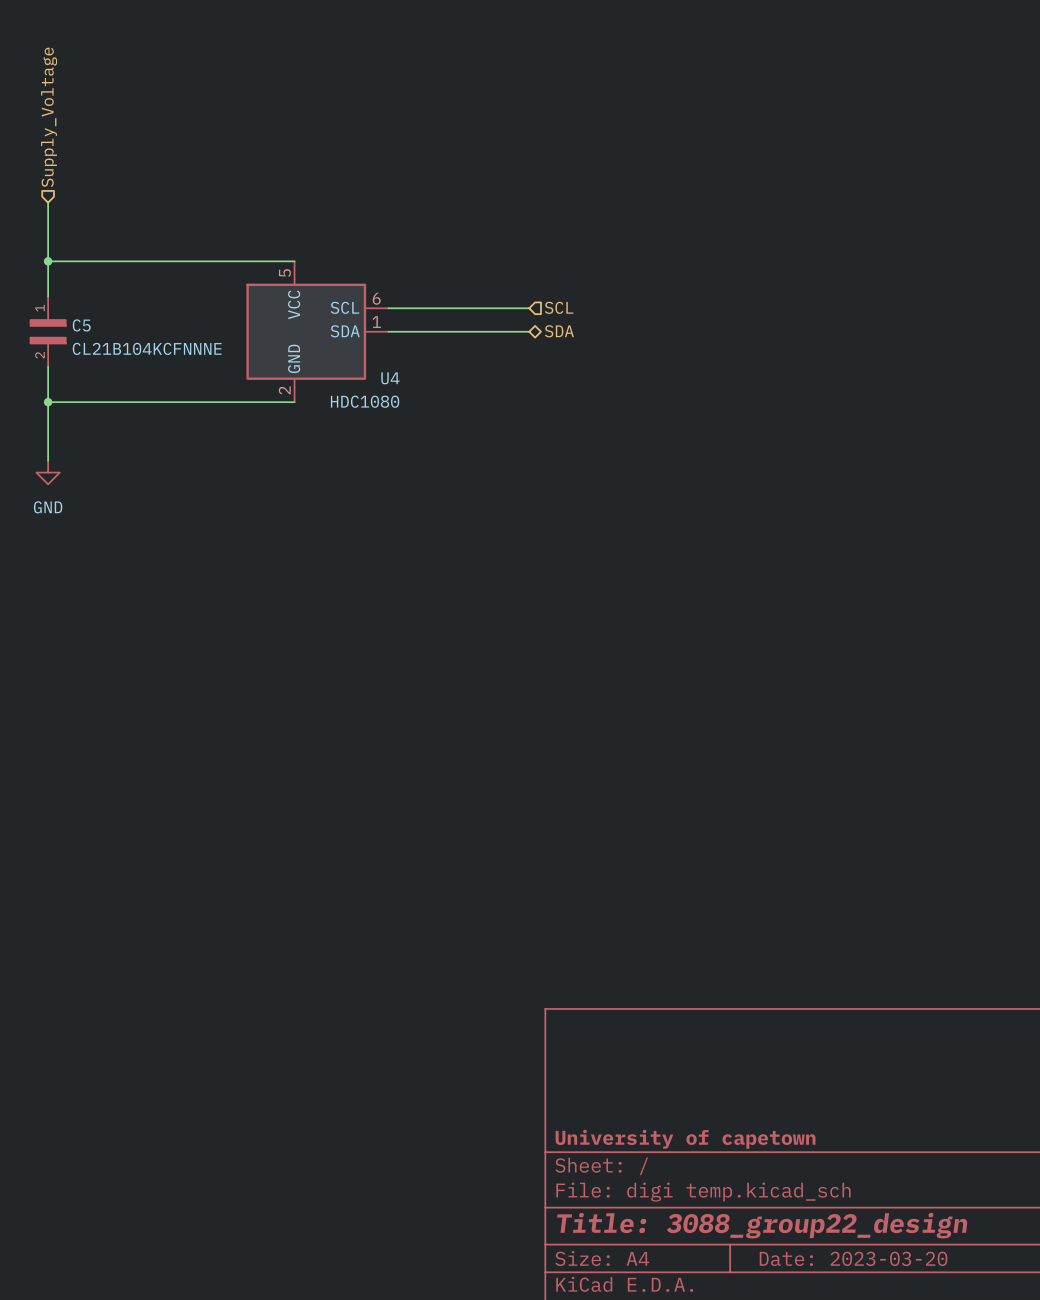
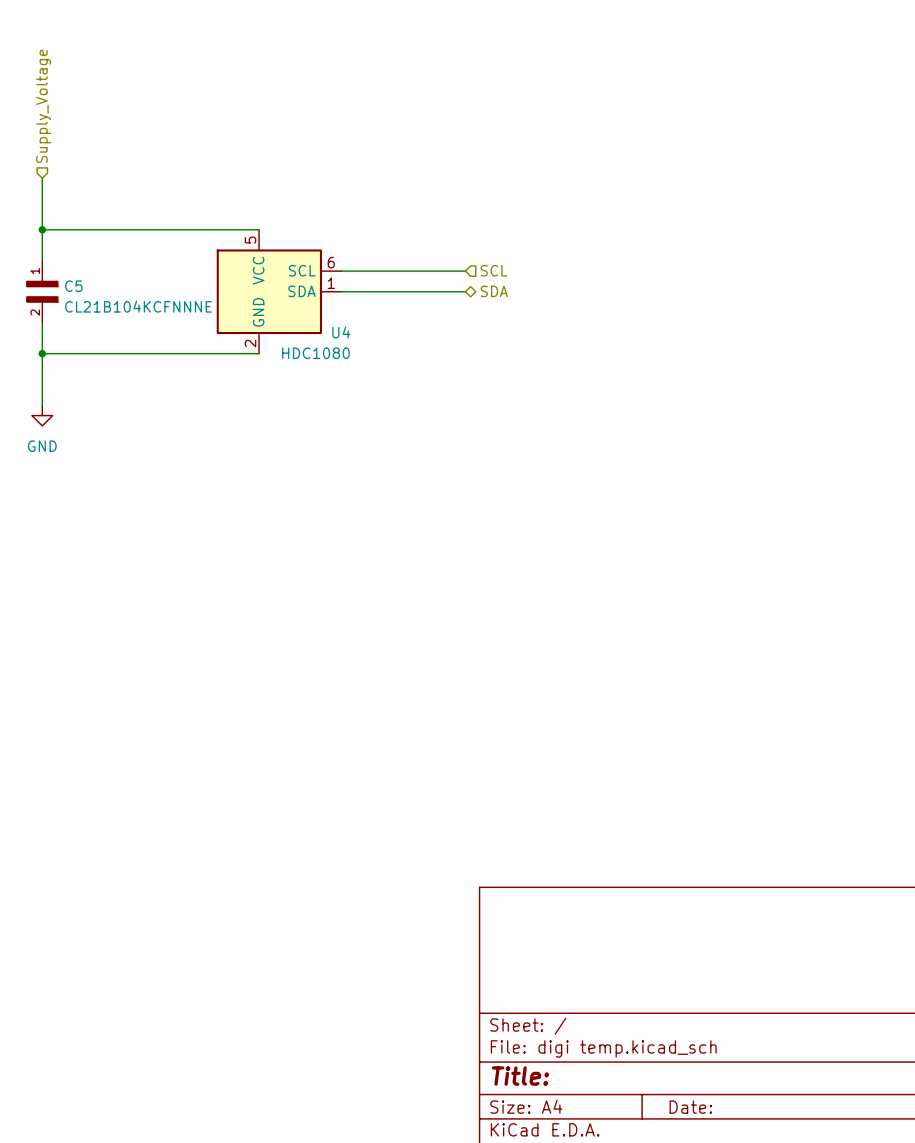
title block: University of capetown (685, 1139) -> none
title block: Title: 3088_group22_design (762, 1225) -> Title: (520, 1076)
title block: Date: 2023-03-20 (853, 1258) -> Date: (690, 1107)

